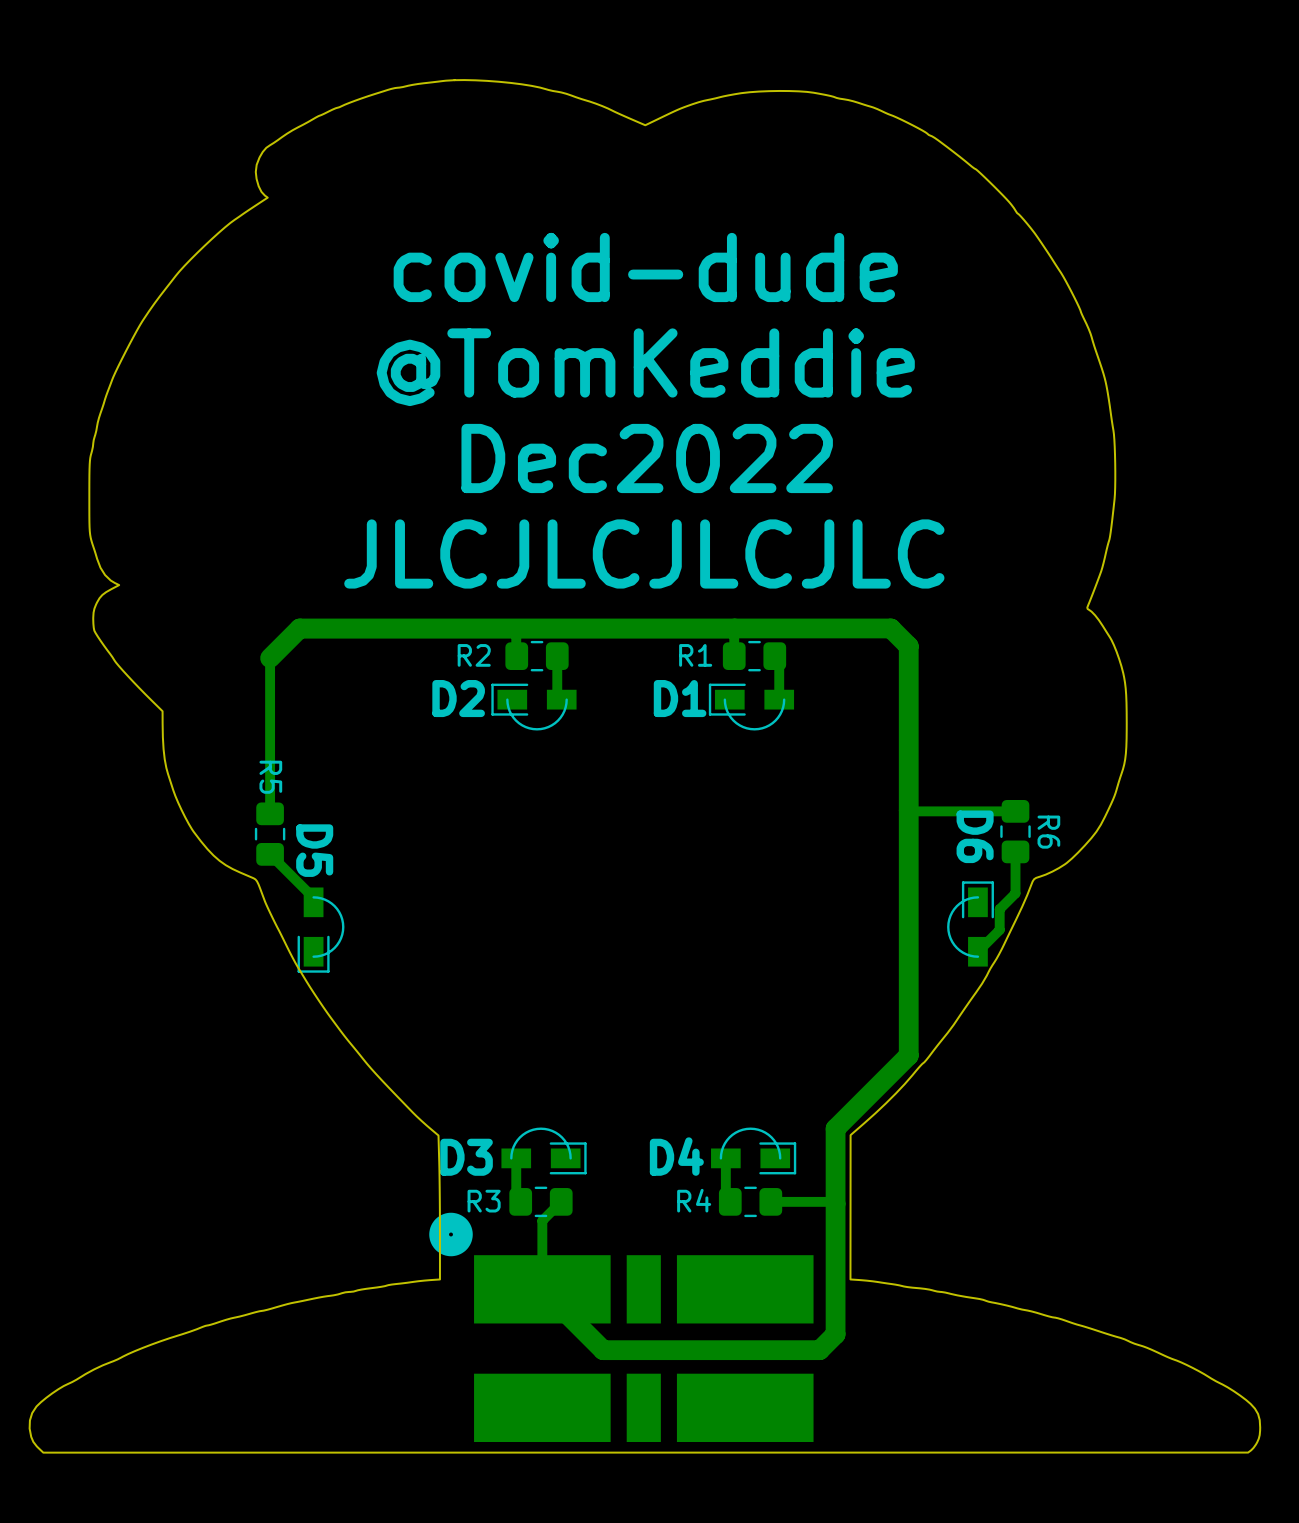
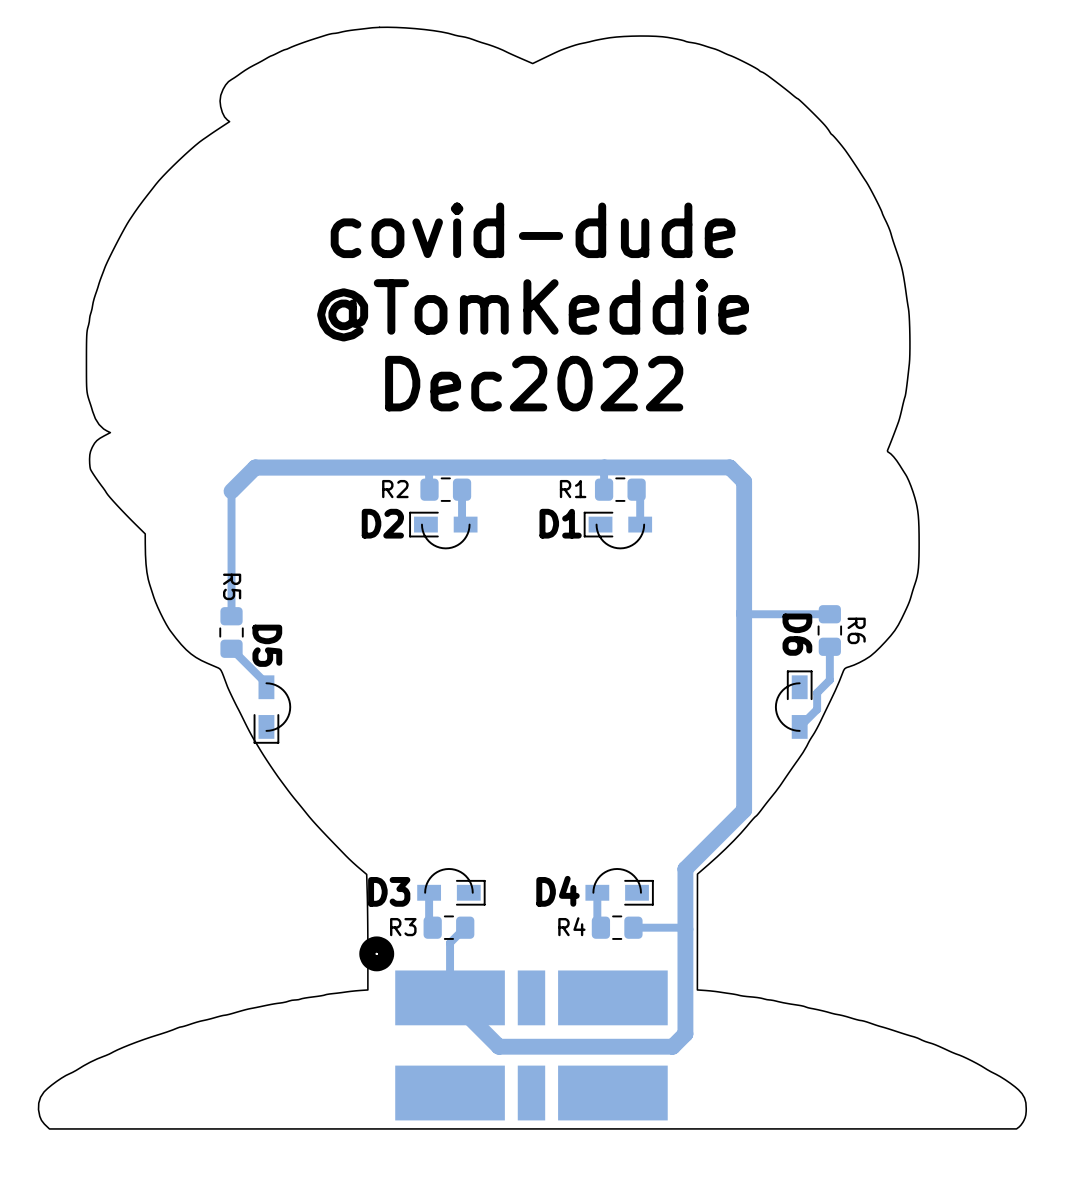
text position: covid-dude (645, 267) -> covid-dude (533, 230)
text position: @TomKeddie (645, 367) -> @TomKeddie (533, 310)
text position: Dec2022 (647, 458) -> Dec2022 (534, 383)
text: JLCJLCJLCJLC (644, 553) -> none

